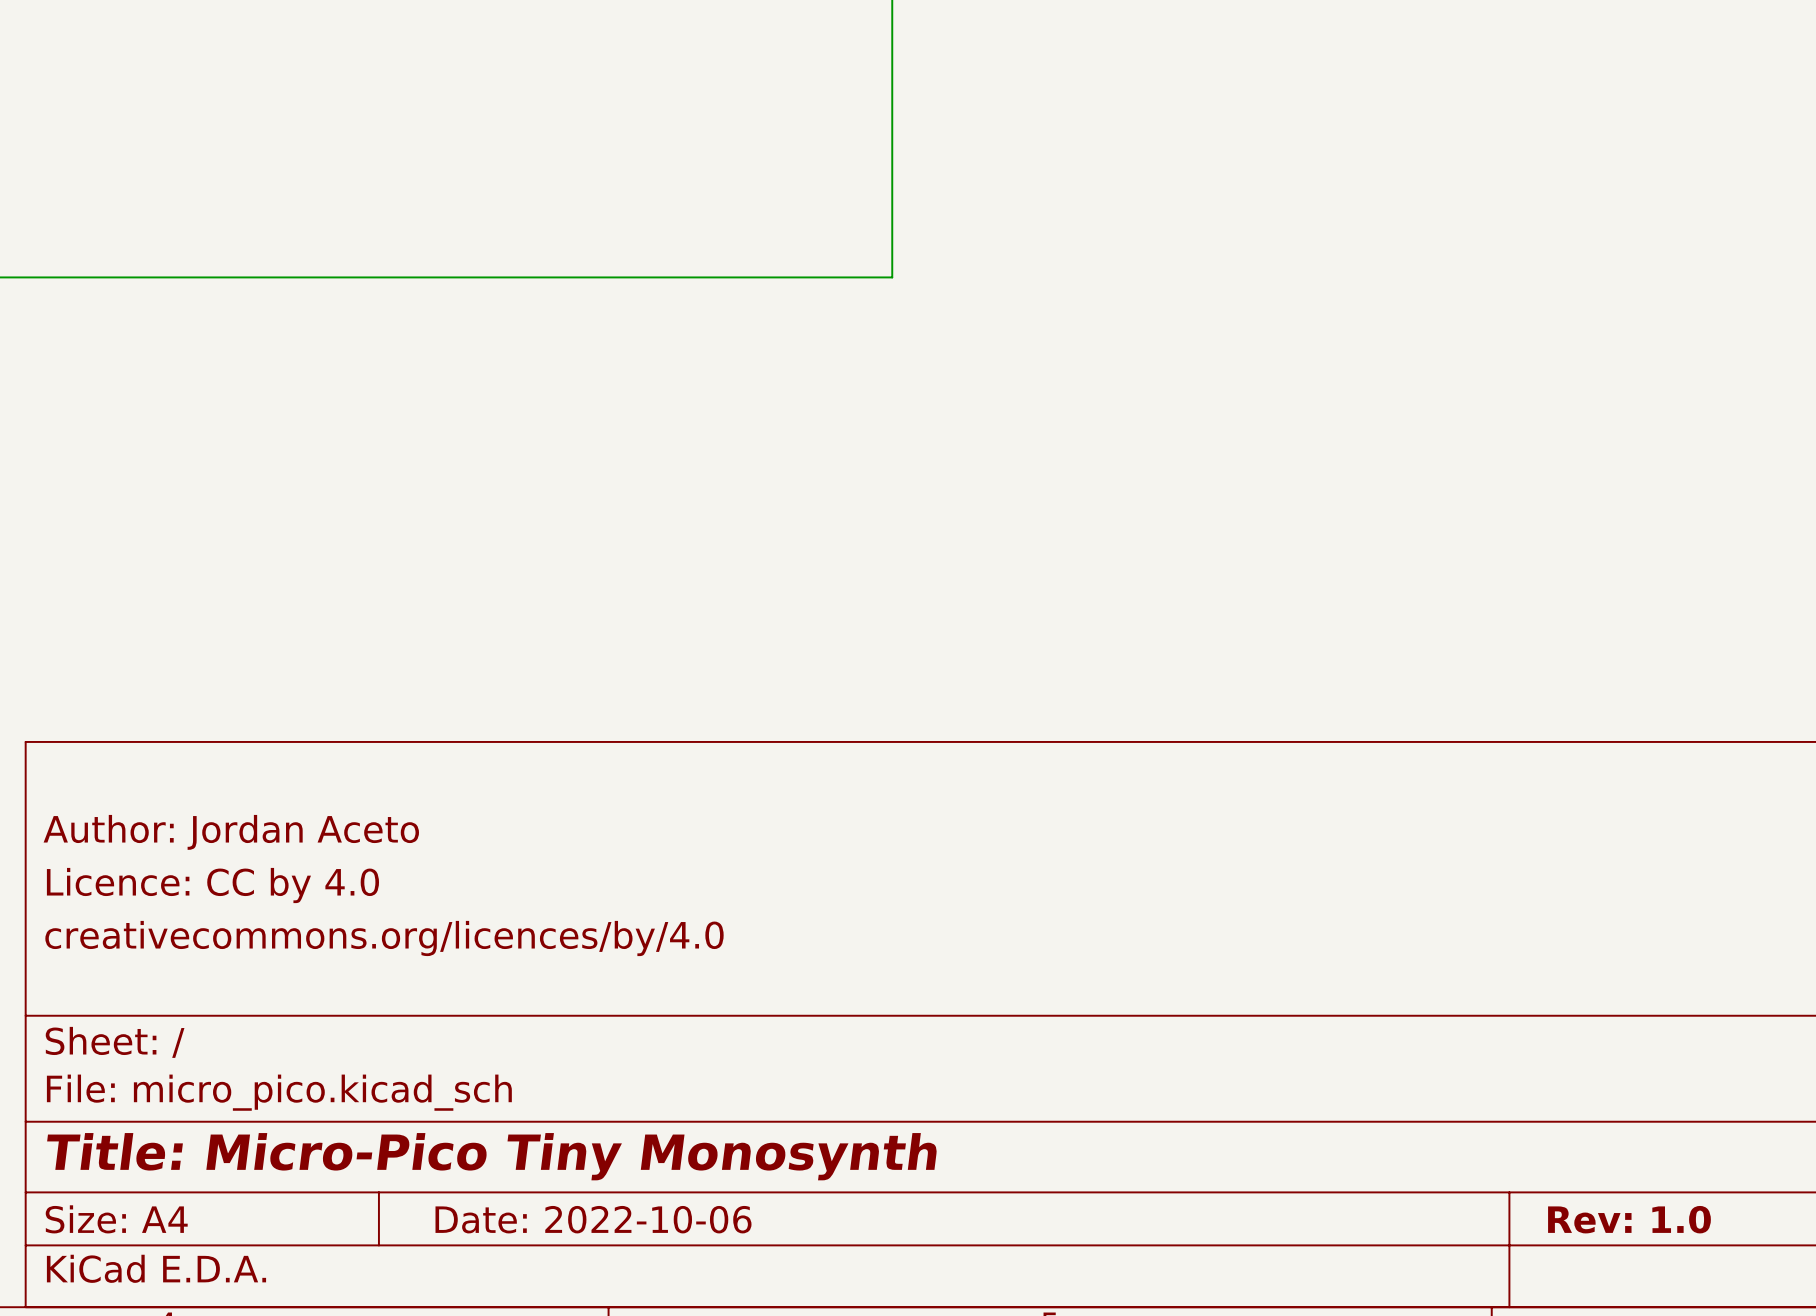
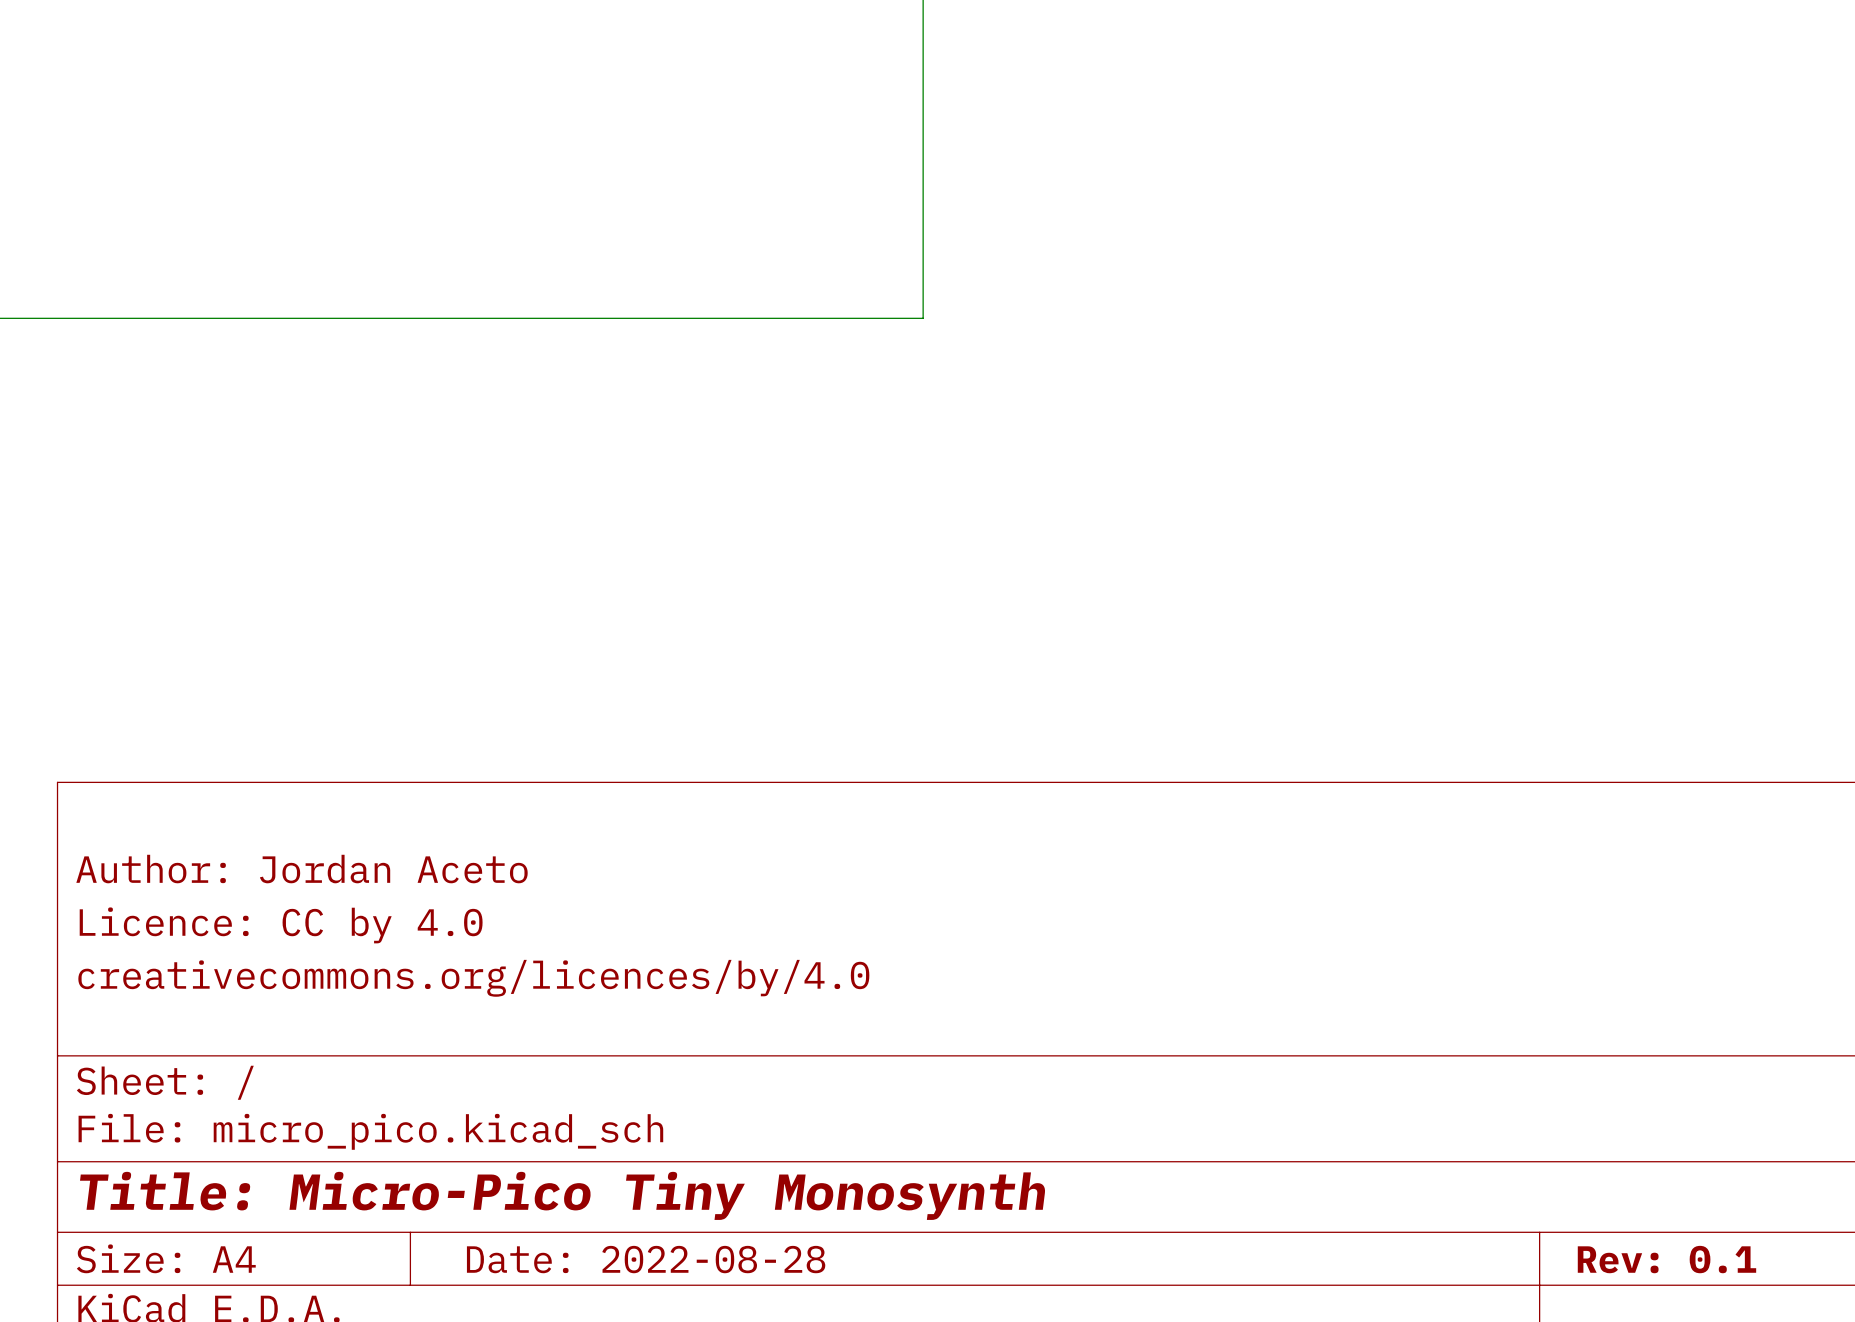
title block: Date: 2022-10-06 (593, 1219) -> Date: 2022-08-28 (646, 1259)
title block: Rev: 1.0 (1629, 1219) -> Rev: 0.1 (1666, 1259)

